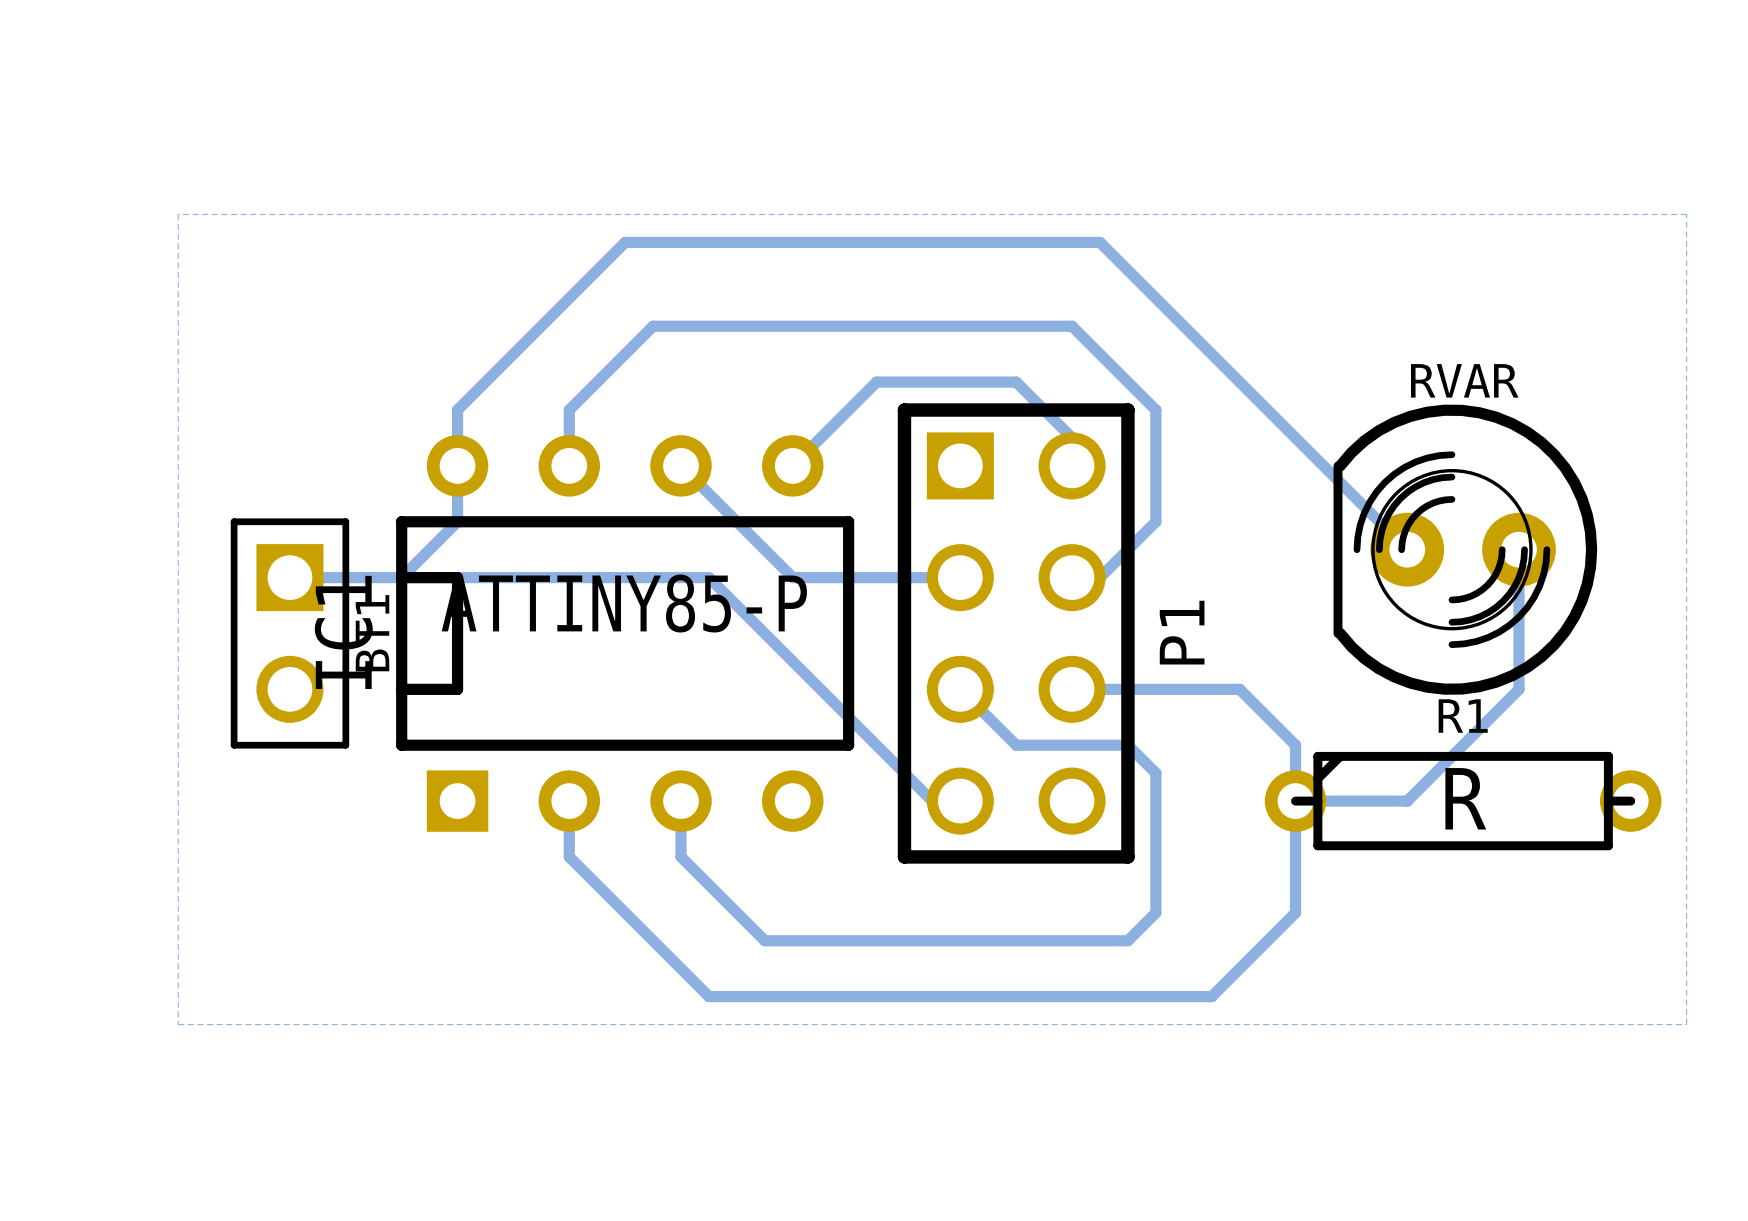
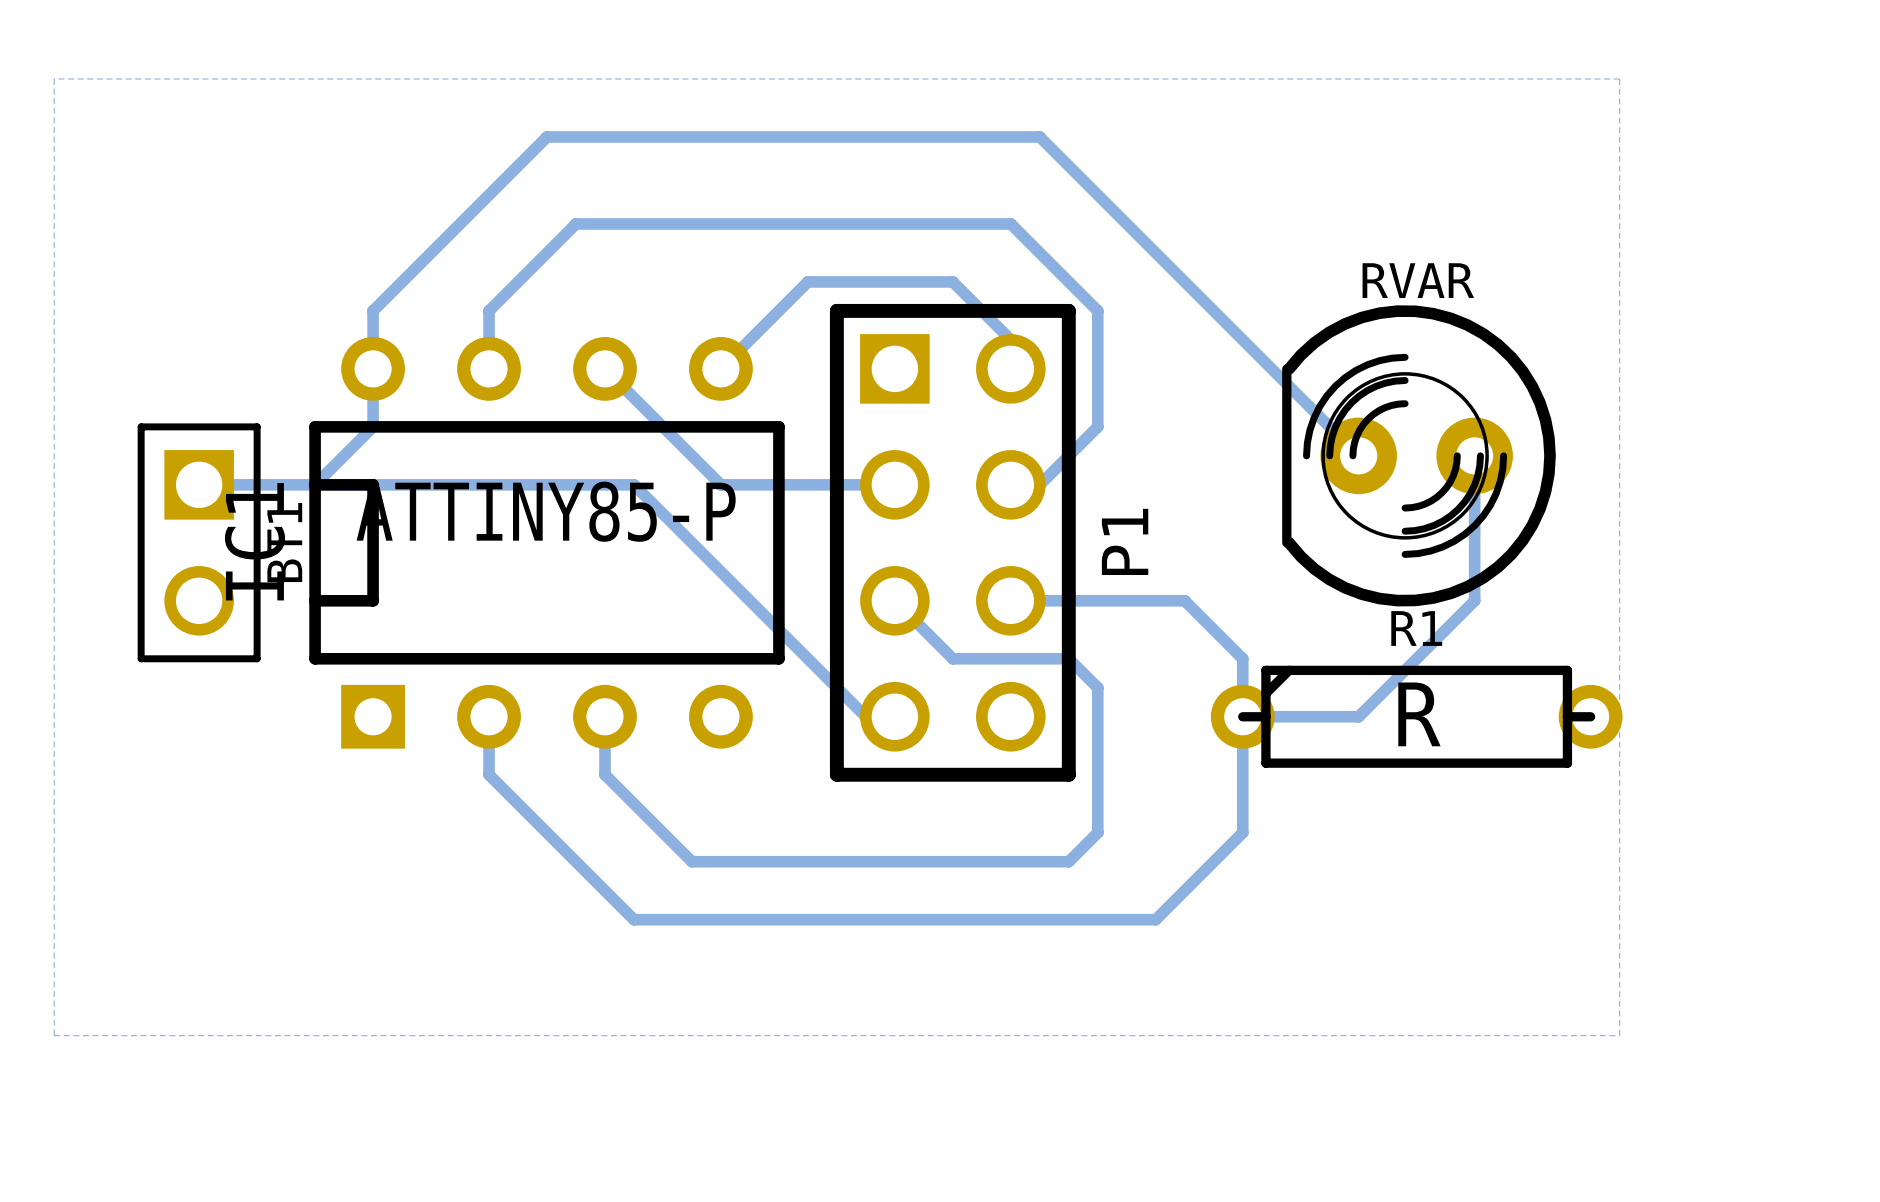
bottom zone outline: (178, 214) (178, 1024) (1686, 1024) (1686, 214) (178, 214) -> (54, 79) (54, 1035) (1619, 1035) (1619, 79) (54, 79)

